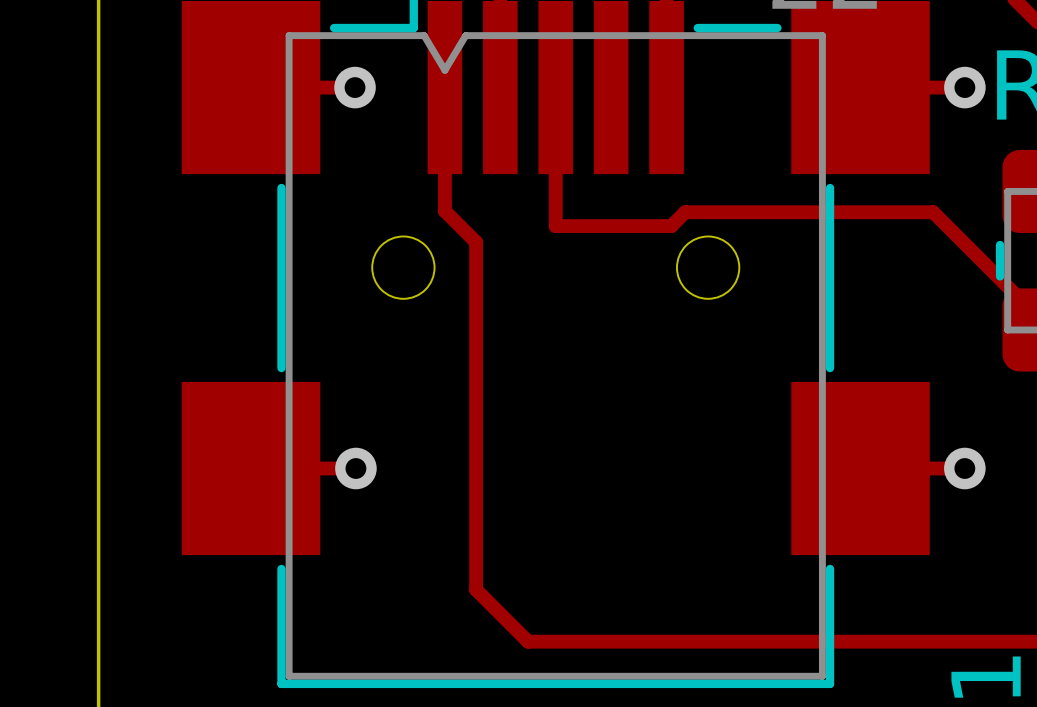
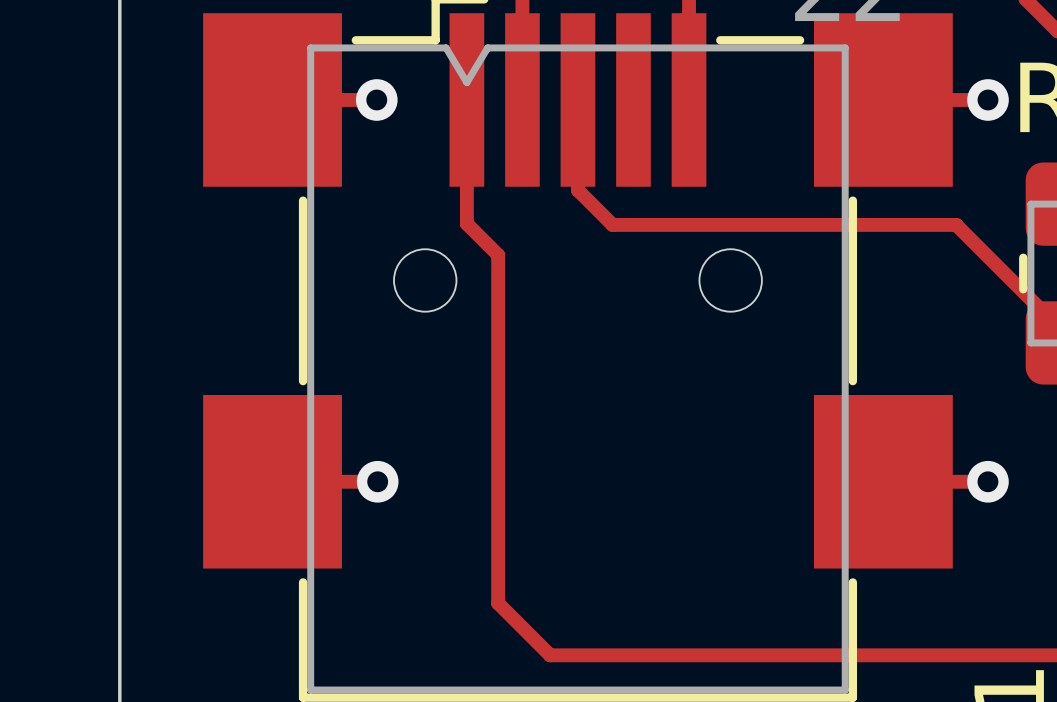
track: (555, 177) (555, 226) (671, 226) (685, 212) -> (577, 190) (612, 224) (707, 224)

